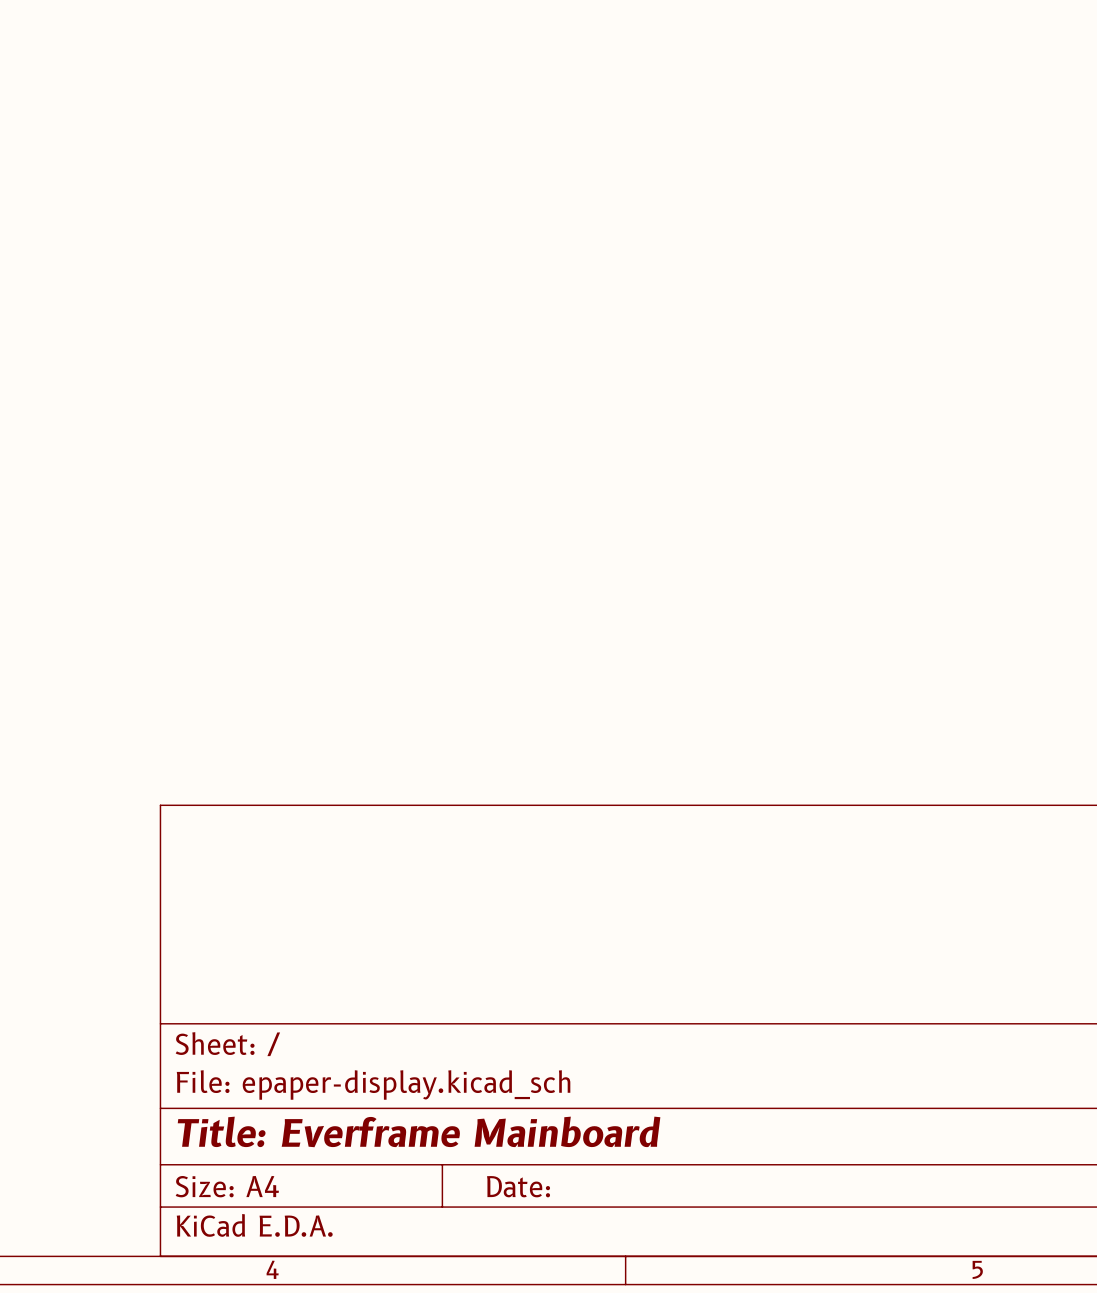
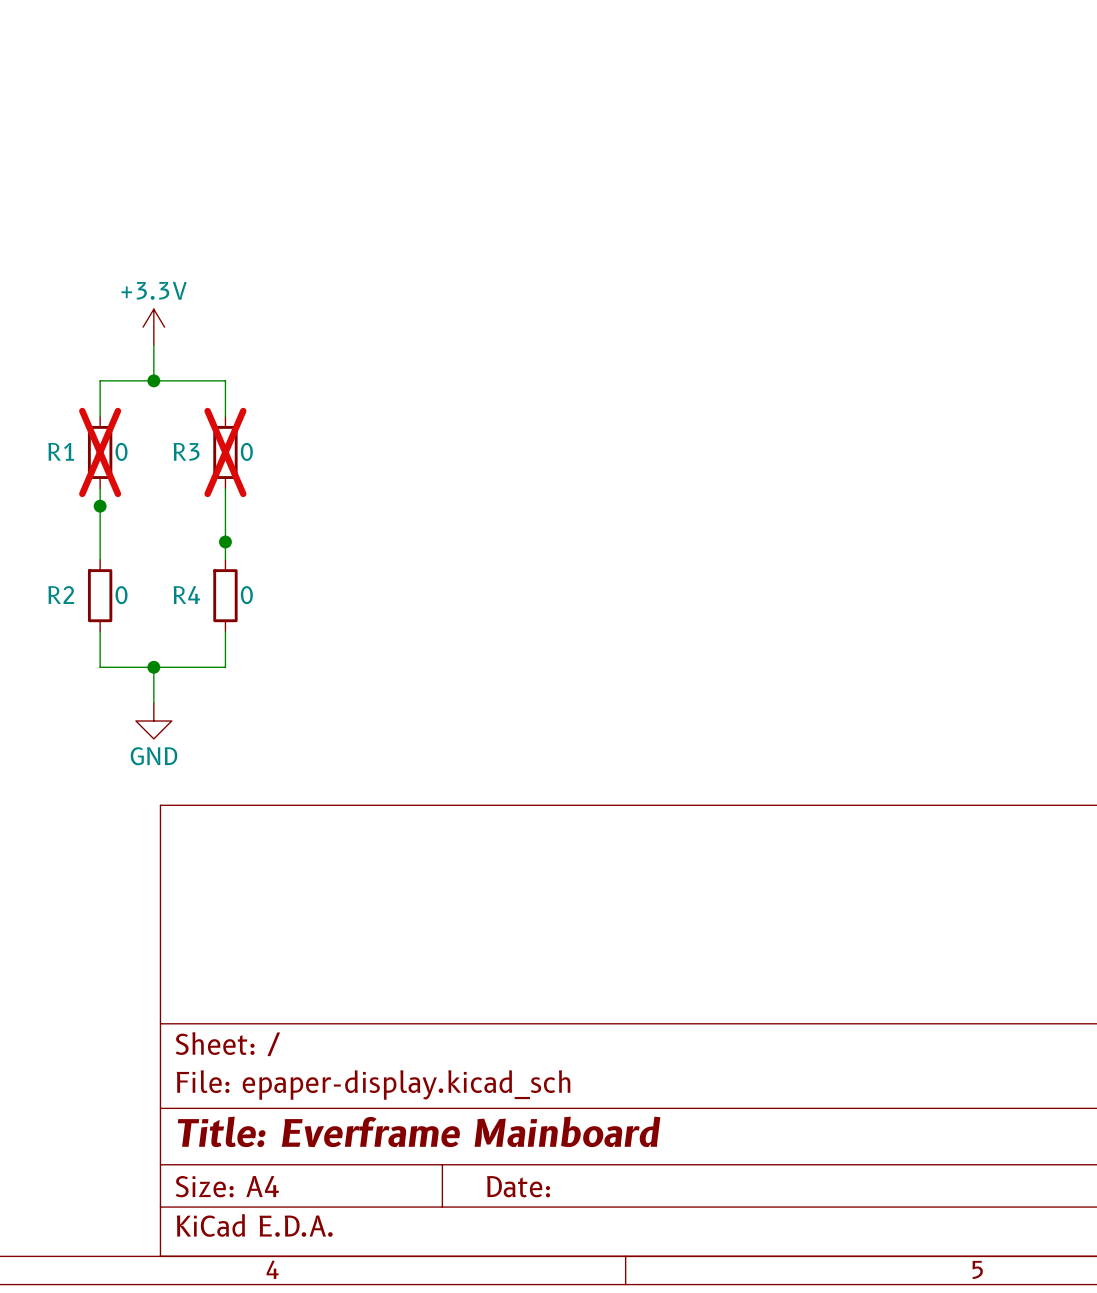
power symbol: none -> +3.3V (153, 327)
wire: none -> (153, 345) (153, 380)
junction: none -> (153, 380)
wire: none -> (100, 416) (100, 380) (225, 380) (225, 416)
R1: none -> 0 (100, 452)
R3: none -> 0 (225, 452)
wire: none -> (100, 488) (100, 559)
wire: none -> (225, 488) (225, 559)
junction: none -> (100, 506)
junction: none -> (225, 541)
R2: none -> 0 (100, 595)
R4: none -> 0 (225, 595)
wire: none -> (100, 631) (100, 667) (225, 667) (225, 631)
wire: none -> (153, 667) (153, 703)
junction: none -> (153, 667)
power symbol: none -> GND (153, 721)

